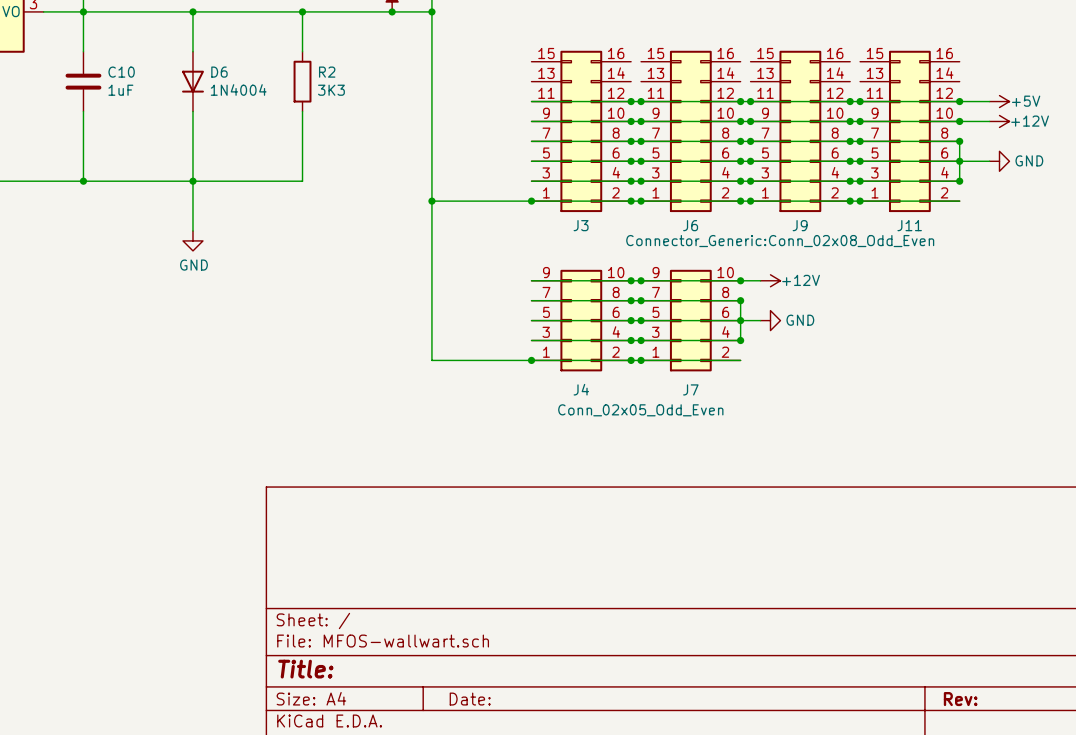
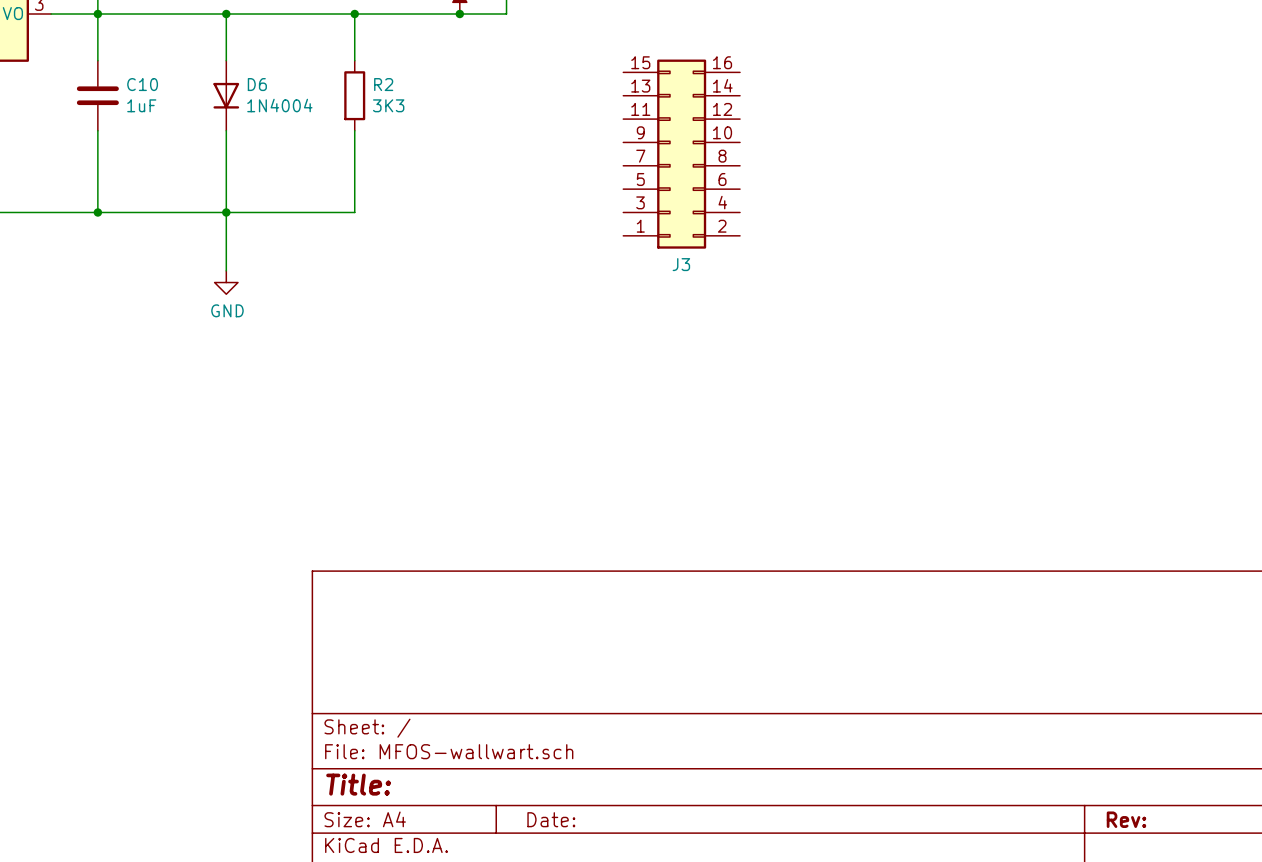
wire: (431, 11) (431, 360) (740, 360) -> none
junction: (431, 11) -> none
wire: (531, 101) (989, 101) -> none
junction: (631, 101) -> none
junction: (641, 101) -> none
junction: (740, 101) -> none
junction: (750, 101) -> none
junction: (850, 101) -> none
junction: (860, 101) -> none
junction: (959, 101) -> none
power symbol: +5V (999, 101) -> none
wire: (531, 121) (989, 121) -> none
junction: (631, 121) -> none
junction: (641, 121) -> none
junction: (740, 121) -> none
junction: (750, 121) -> none
junction: (850, 121) -> none
junction: (860, 121) -> none
junction: (959, 121) -> none
power symbol: +12V (999, 121) -> none
J6: (690, 131) -> none
J9: Connector_Generic:Conn_02x08_Odd_Even (800, 131) -> none
J11: (909, 131) -> none
wire: (531, 141) (959, 141) (959, 181) (531, 181) -> none
junction: (631, 141) -> none
junction: (641, 141) -> none
junction: (740, 141) -> none
junction: (750, 141) -> none
junction: (850, 141) -> none
junction: (860, 141) -> none
junction: (959, 141) -> none
wire: (531, 161) (989, 161) -> none
junction: (631, 161) -> none
junction: (641, 161) -> none
junction: (740, 161) -> none
junction: (750, 161) -> none
junction: (850, 161) -> none
junction: (860, 161) -> none
junction: (959, 161) -> none
power symbol: GND (999, 161) -> none
junction: (631, 181) -> none
junction: (641, 181) -> none
junction: (740, 181) -> none
junction: (750, 181) -> none
junction: (850, 181) -> none
junction: (860, 181) -> none
junction: (959, 181) -> none
wire: (431, 201) (959, 201) -> none
junction: (431, 201) -> none
junction: (531, 201) -> none
junction: (631, 201) -> none
junction: (641, 201) -> none
junction: (740, 201) -> none
junction: (750, 201) -> none
junction: (850, 201) -> none
junction: (860, 201) -> none
wire: (531, 280) (760, 280) -> none
junction: (631, 280) -> none
junction: (641, 280) -> none
junction: (740, 280) -> none
power symbol: +12V (770, 280) -> none
wire: (531, 300) (740, 300) (740, 340) (531, 340) -> none
junction: (631, 300) -> none
junction: (641, 300) -> none
junction: (740, 300) -> none
wire: (531, 320) (760, 320) -> none
J4: Conn_02x05_Odd_Even (581, 320) -> none
junction: (631, 320) -> none
junction: (641, 320) -> none
J7: (690, 320) -> none
junction: (740, 320) -> none
power symbol: GND (770, 320) -> none
junction: (631, 340) -> none
junction: (641, 340) -> none
junction: (740, 340) -> none
junction: (531, 360) -> none
junction: (631, 360) -> none
junction: (641, 360) -> none

